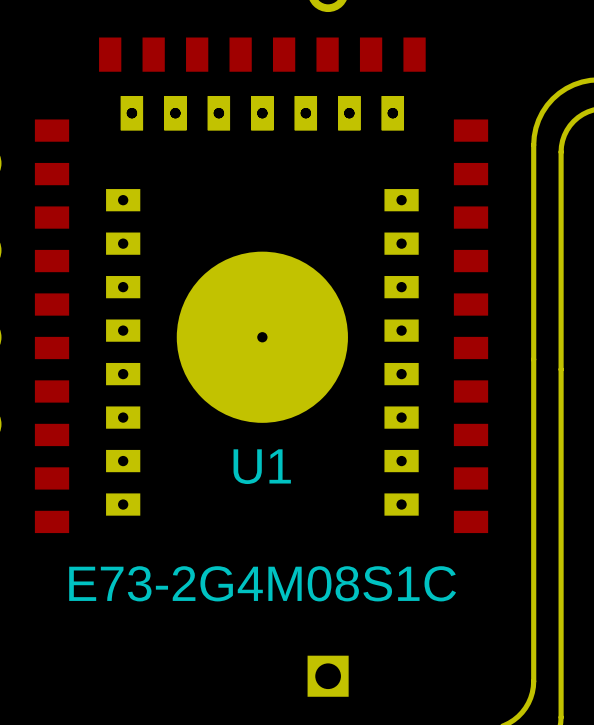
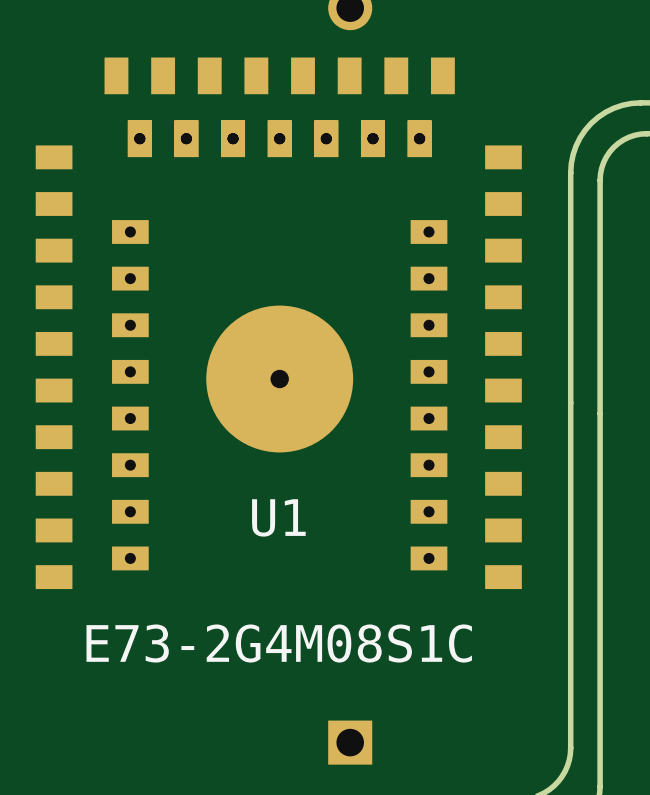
part footprint: [176, 251, 348, 423] -> [206, 305, 354, 453]

